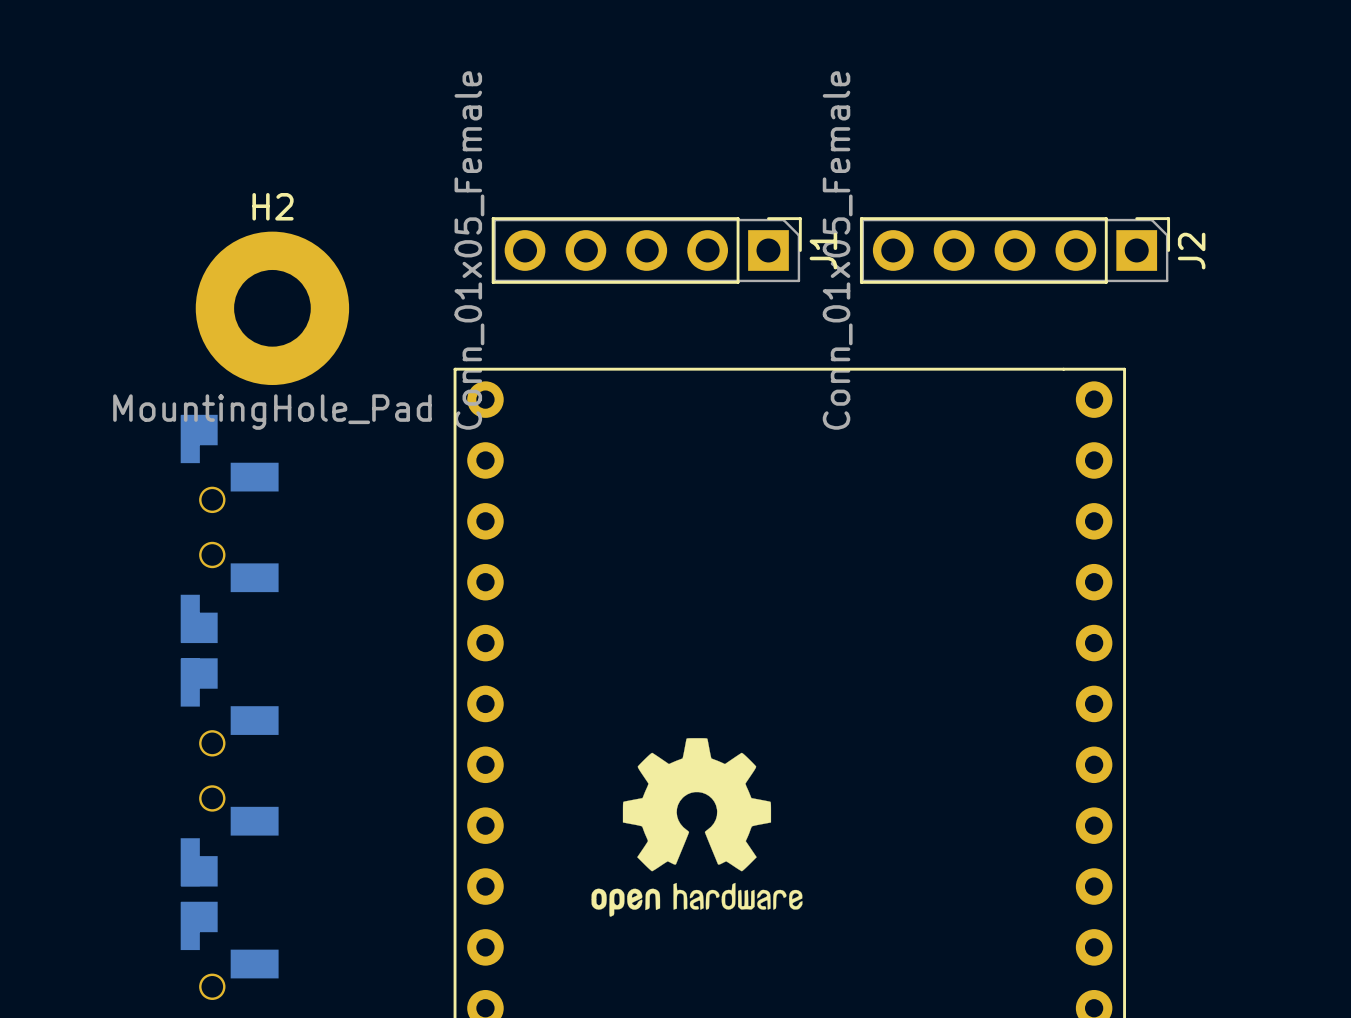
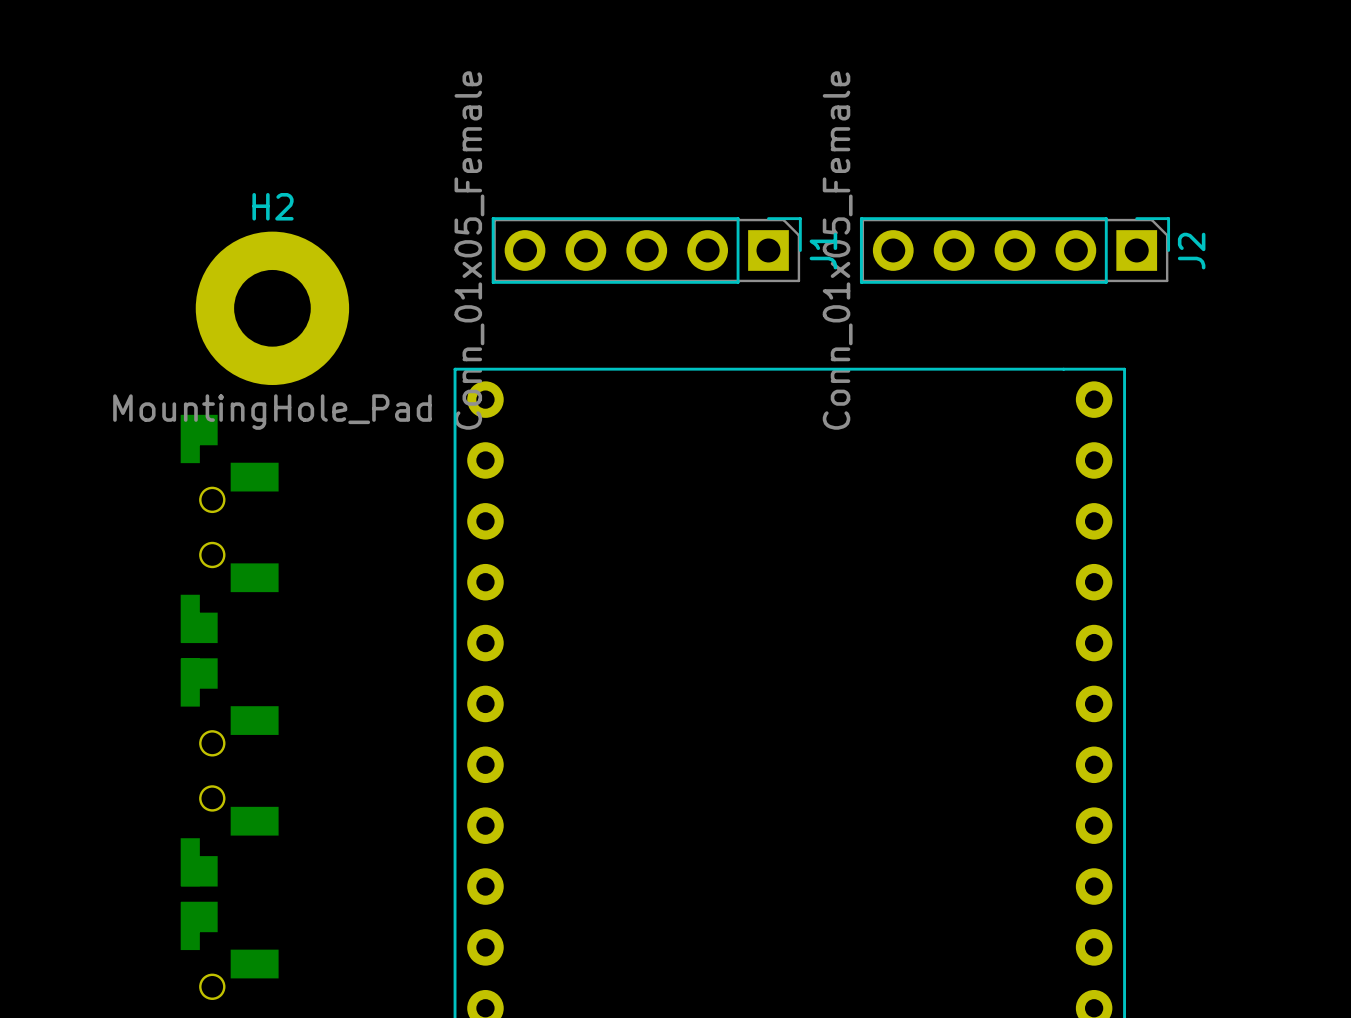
drawing: [591, 738, 803, 917] -> none

